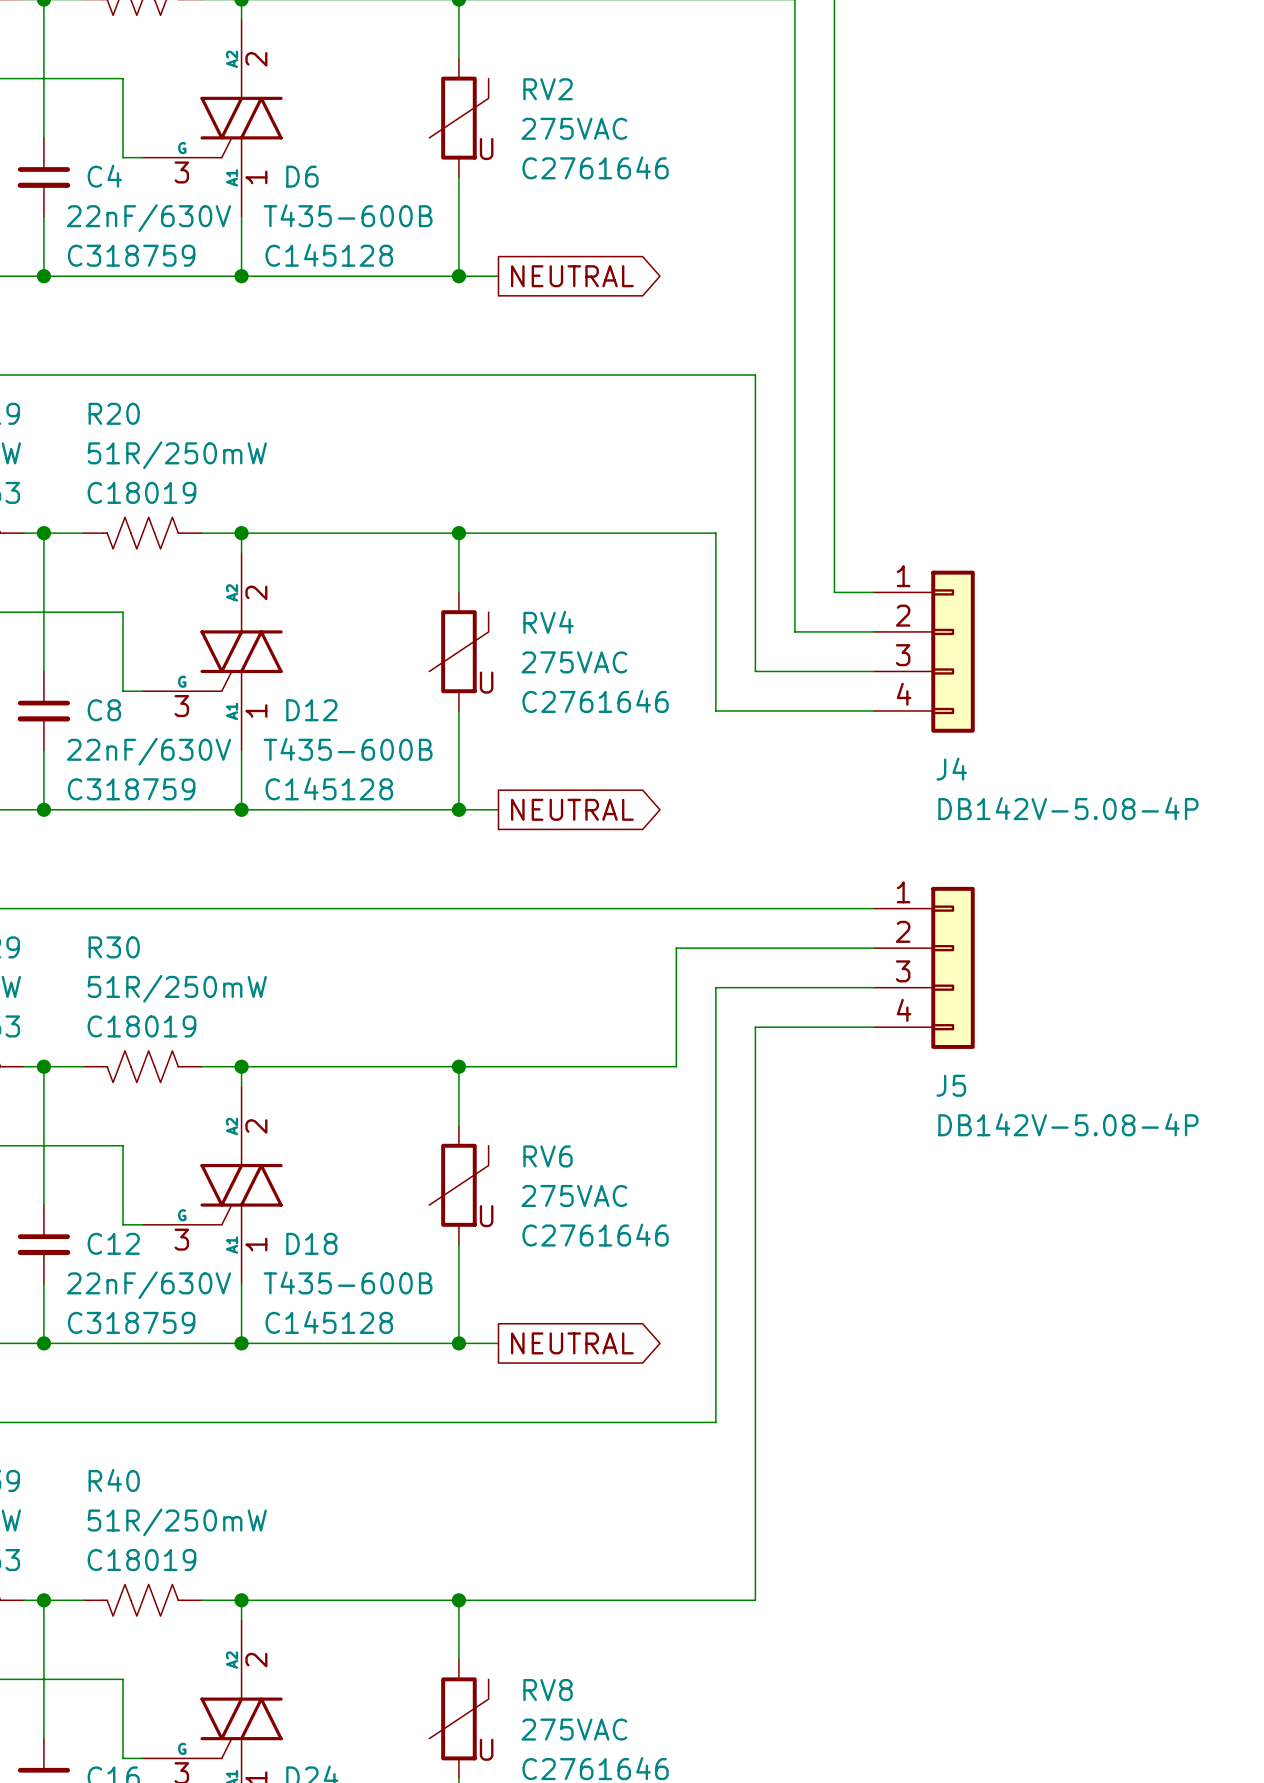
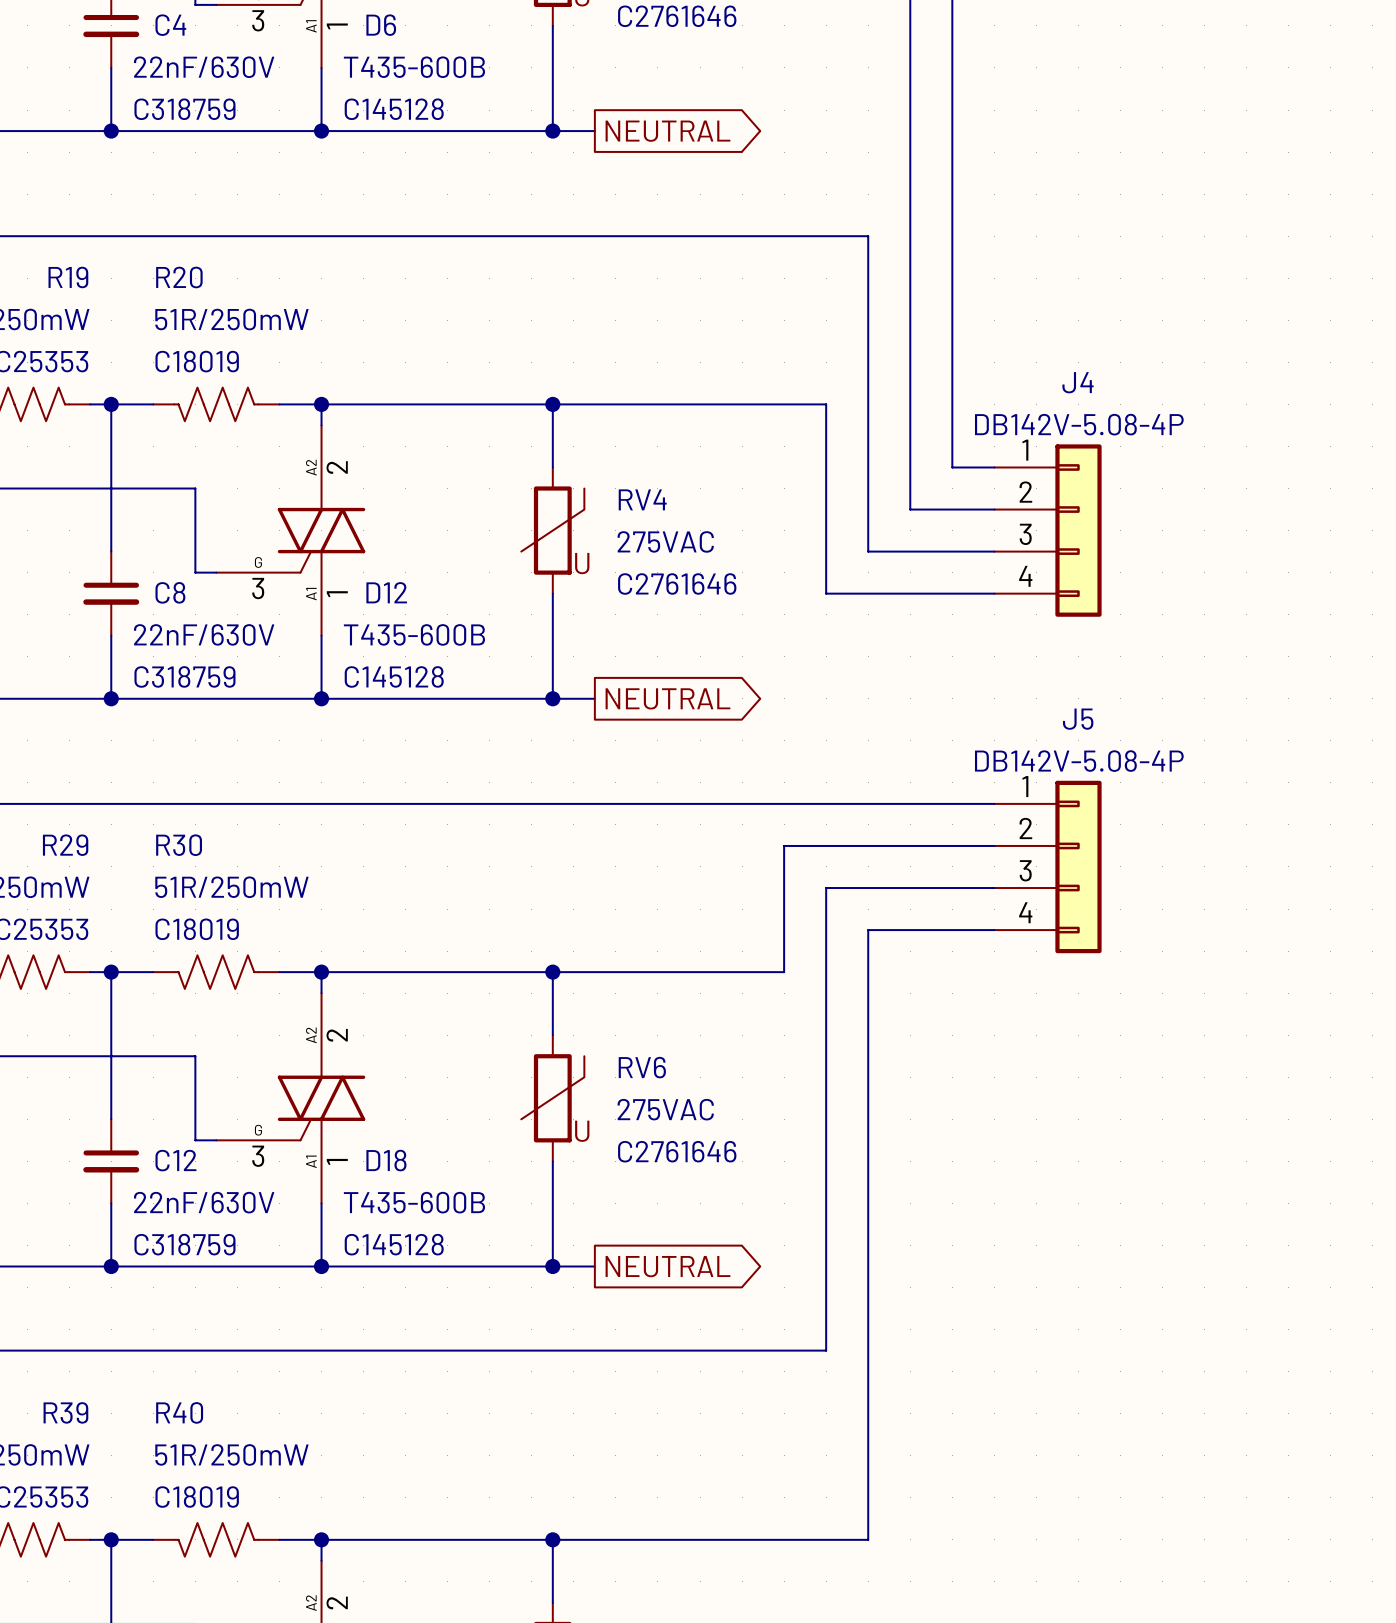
J4 name position: J4 (951, 769) -> J4 (1078, 382)
J4 value position: DB142V-5.08-4P (1068, 808) -> DB142V-5.08-4P (1079, 424)
J5 name position: J5 (951, 1085) -> J5 (1078, 719)
J5 value position: DB142V-5.08-4P (1068, 1124) -> DB142V-5.08-4P (1079, 761)

